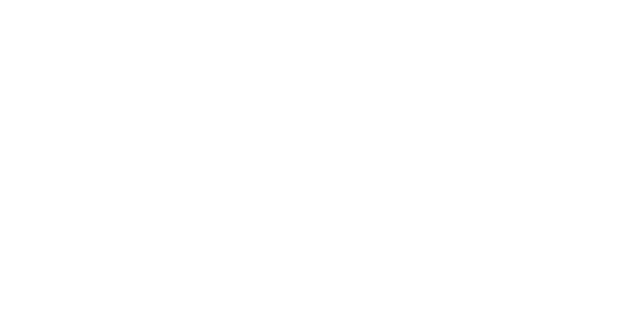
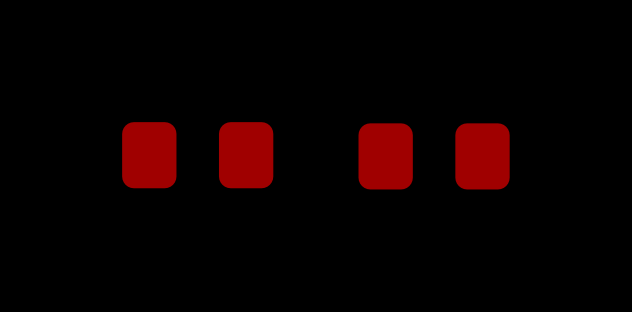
part: none -> (197, 155)
part: none -> (434, 156)

